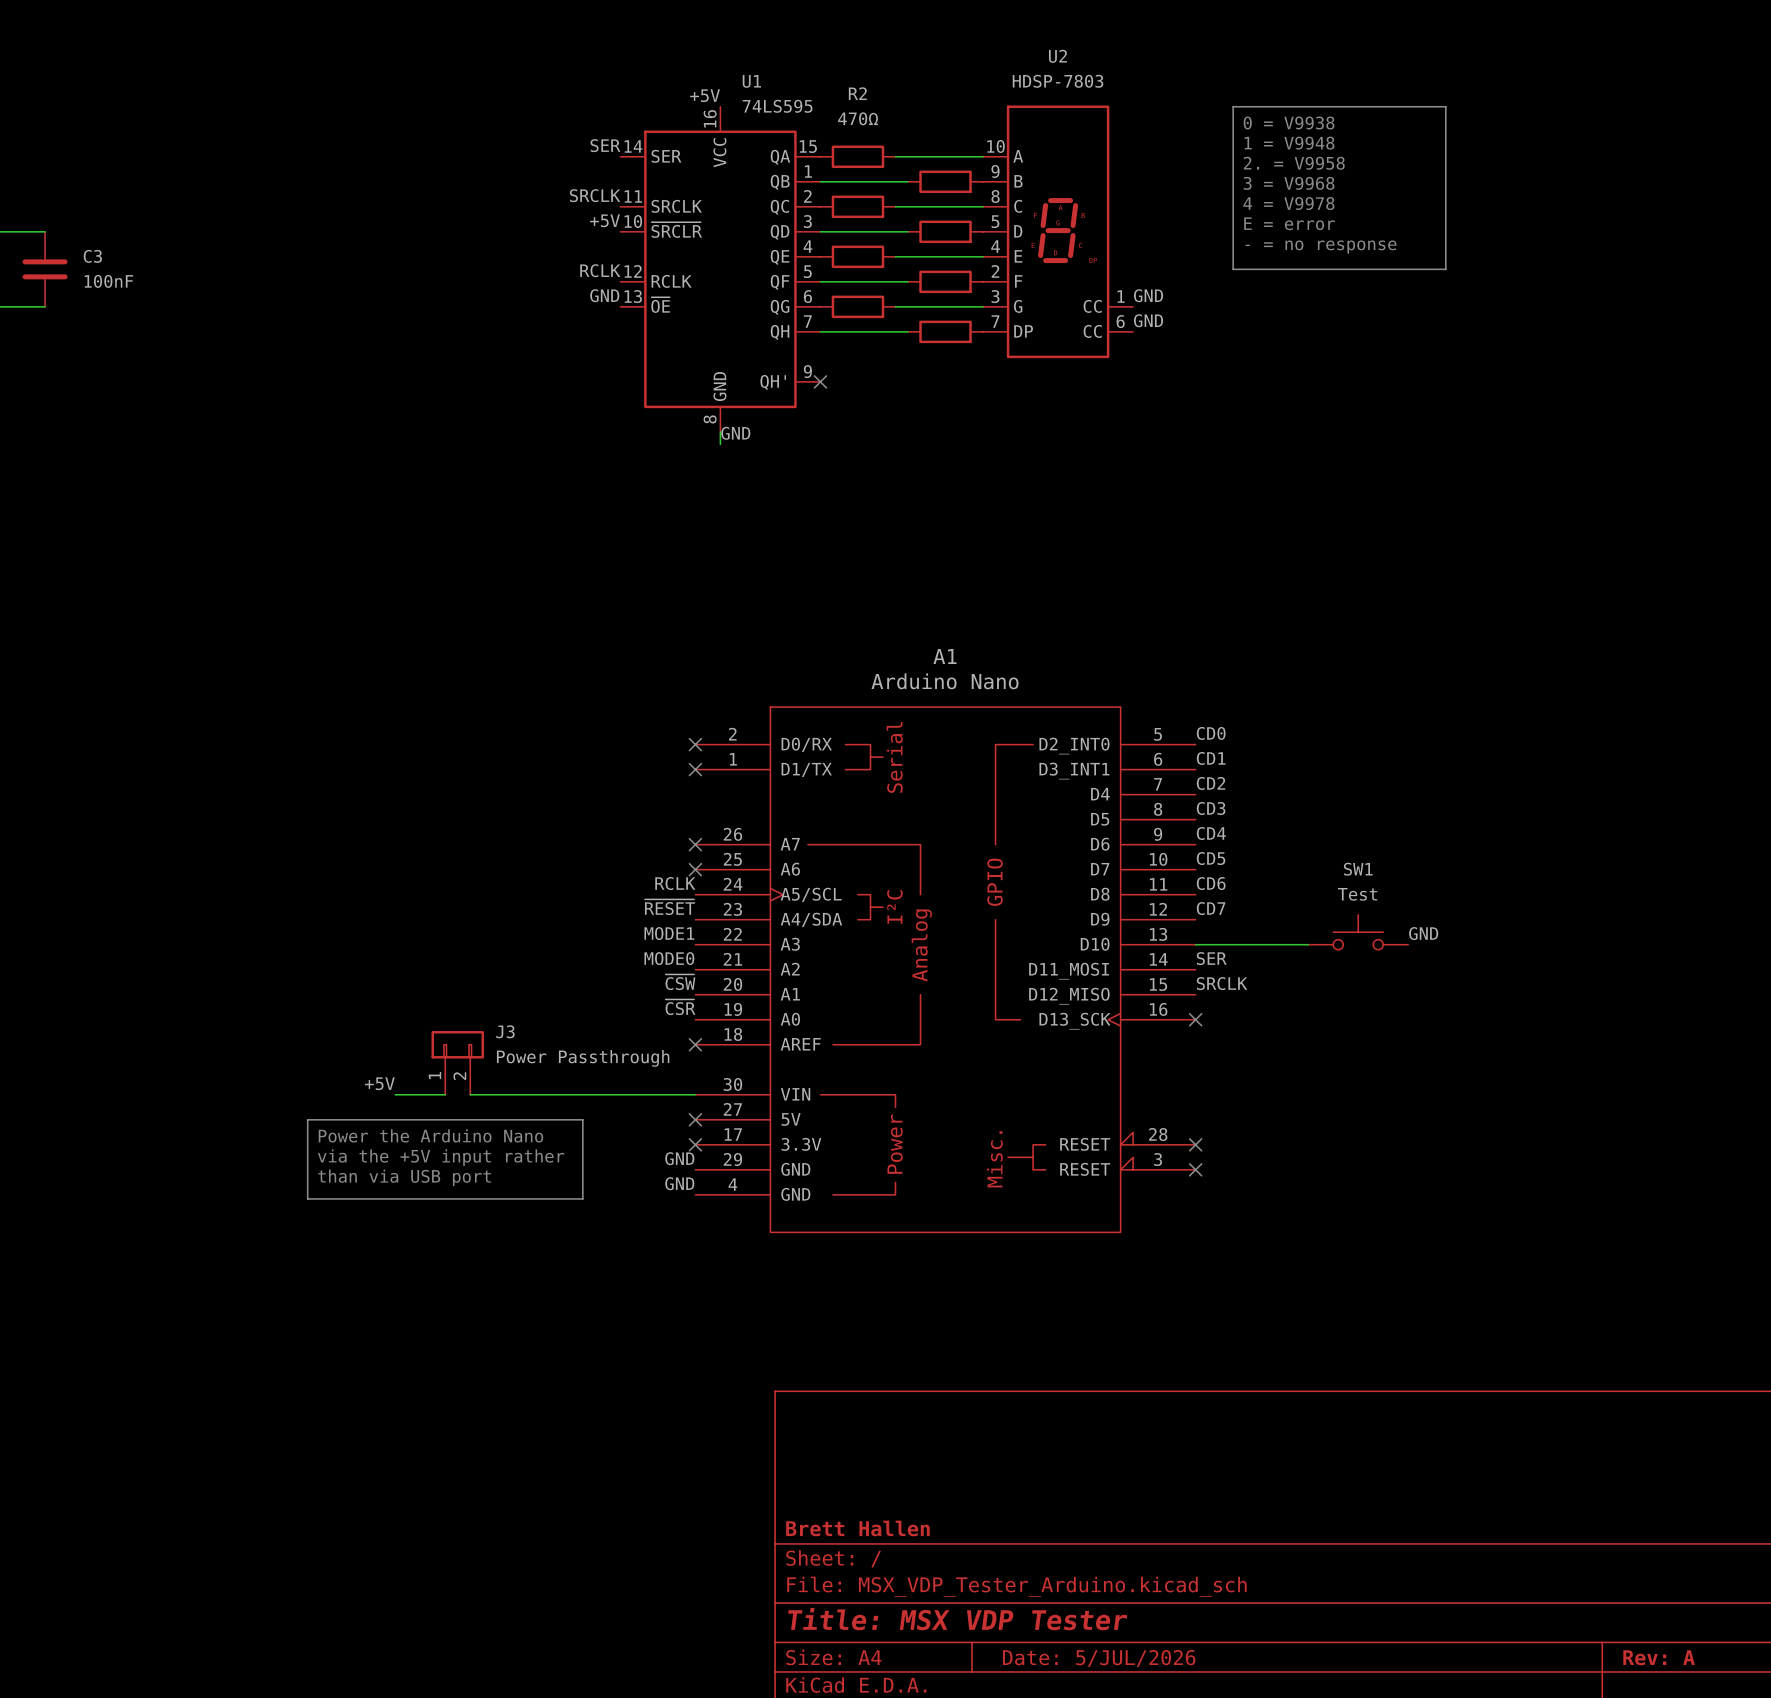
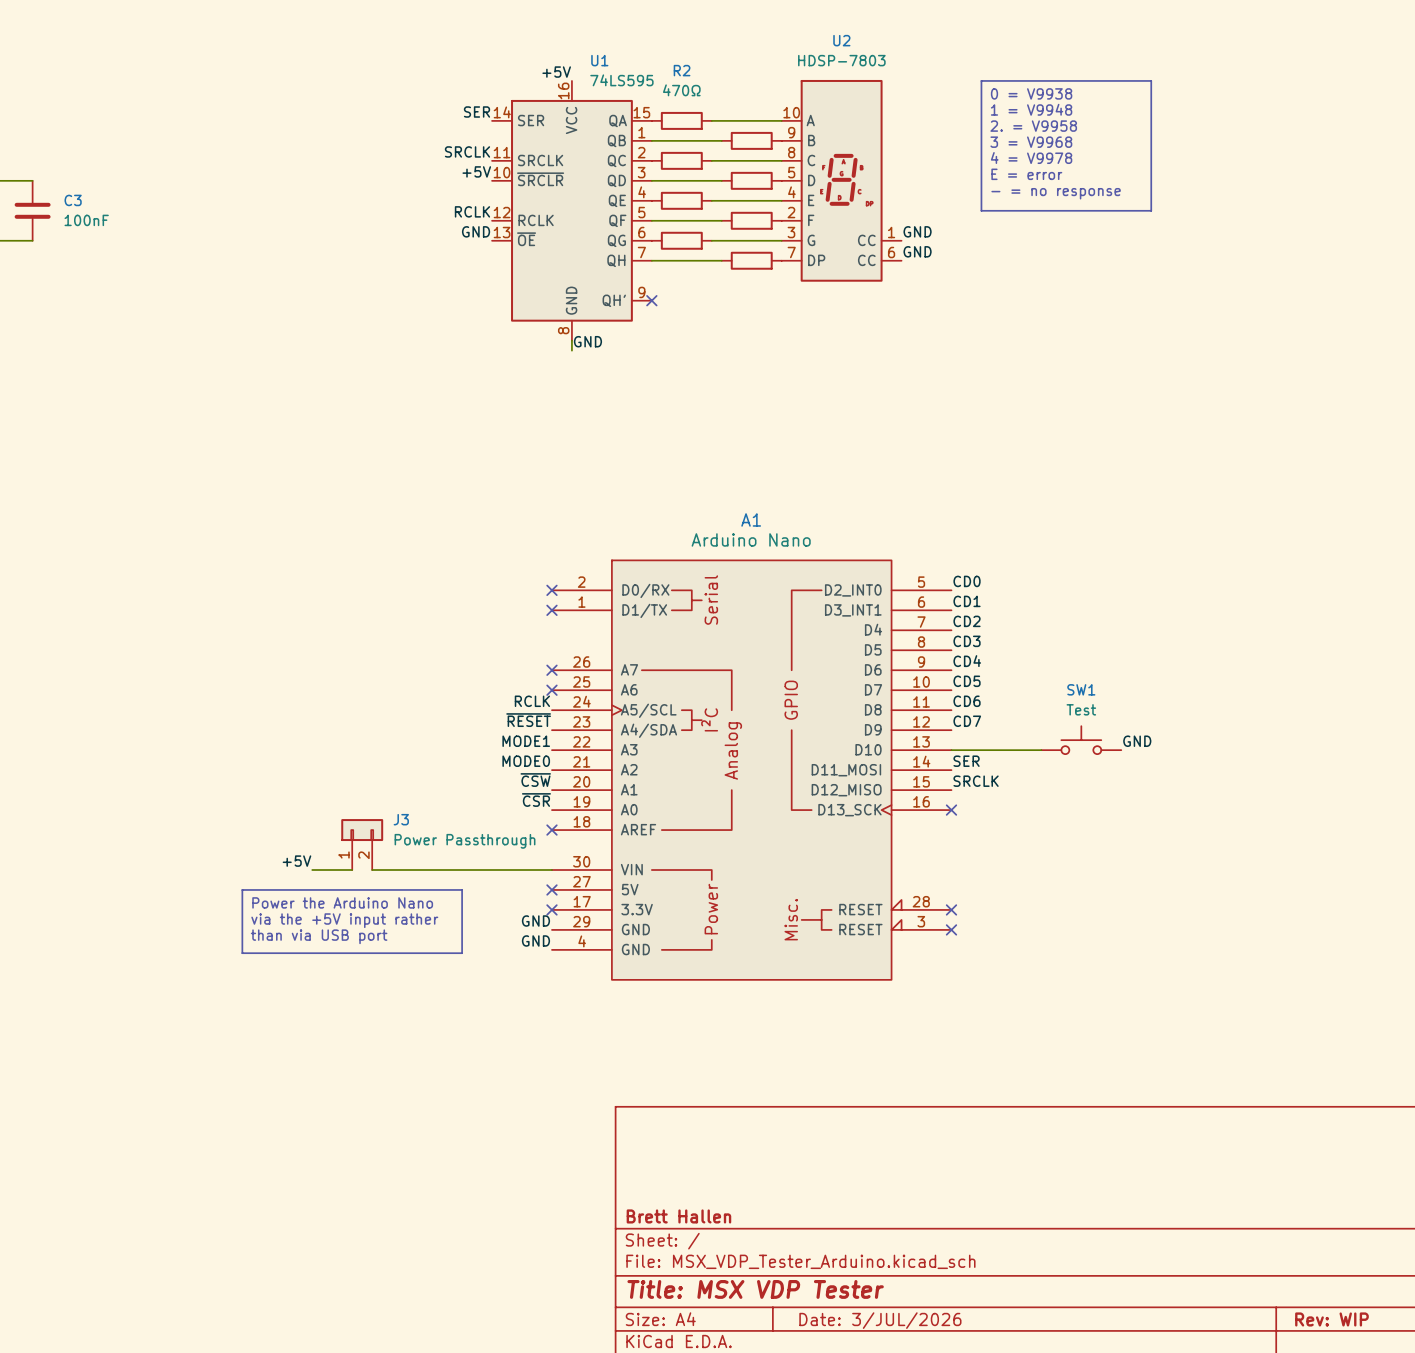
title block: Rev: A (1659, 1657) -> Rev: WIP (1331, 1319)
title block: Date: 5/JUL/2026 (1099, 1658) -> Date: 3/JUL/2026 (880, 1320)

